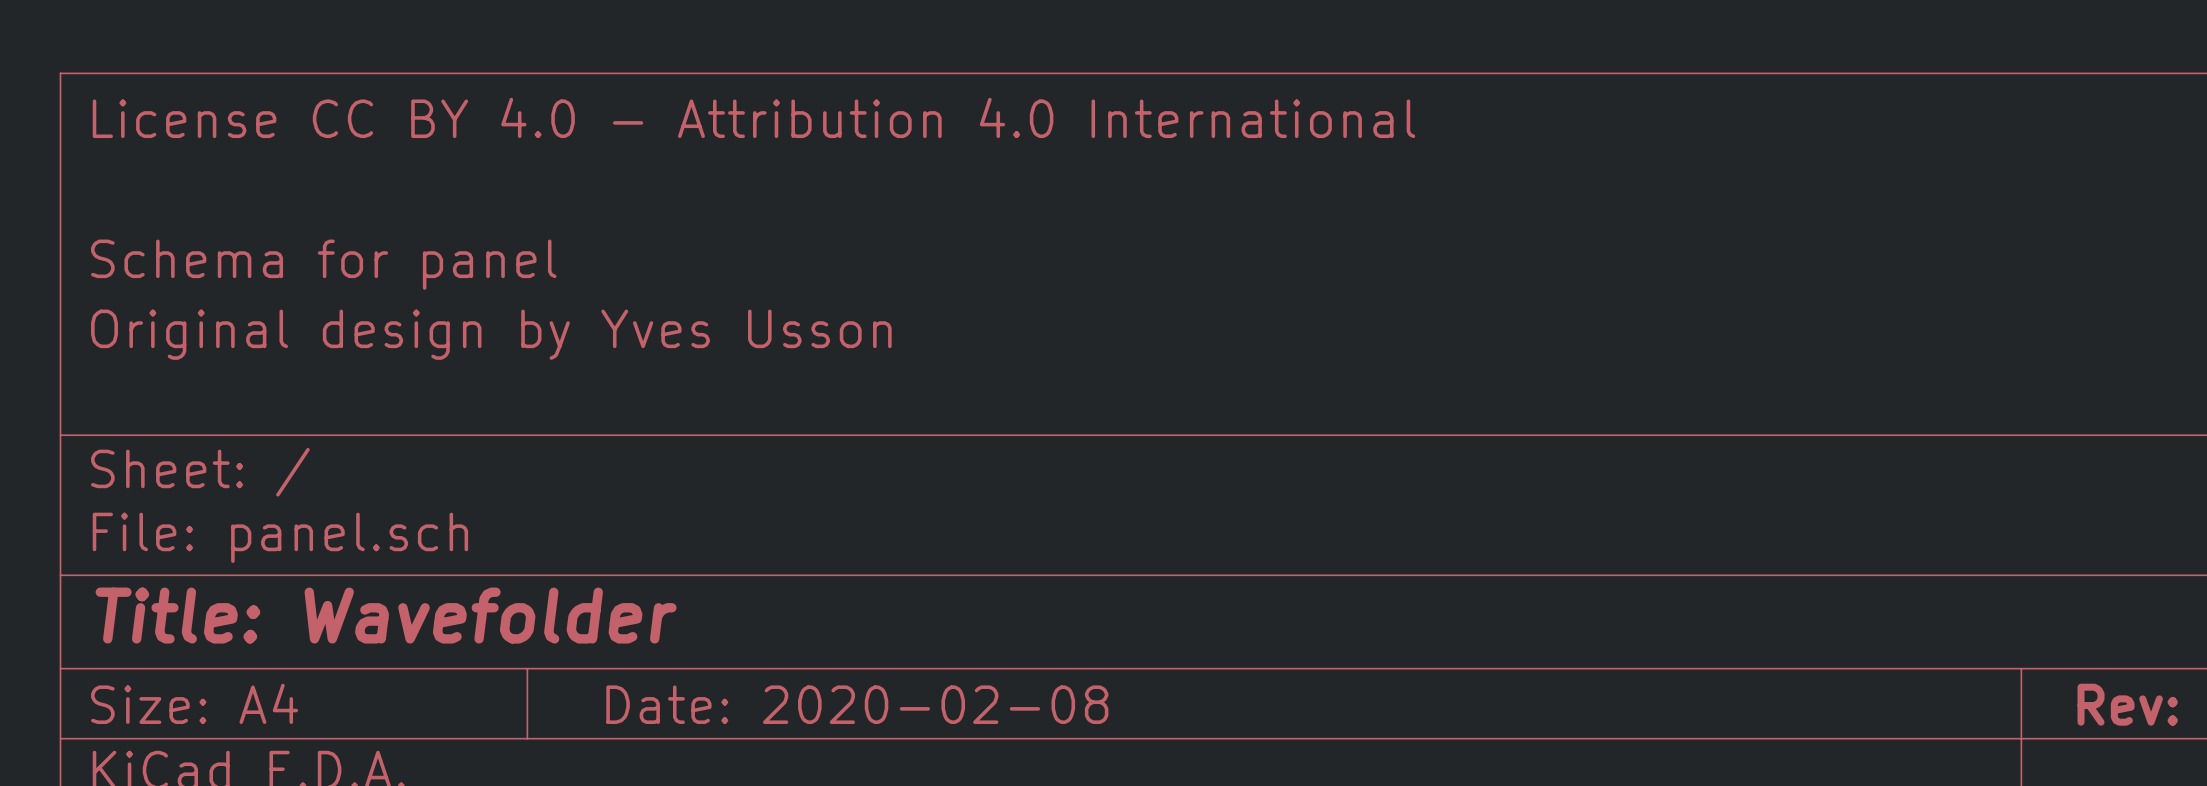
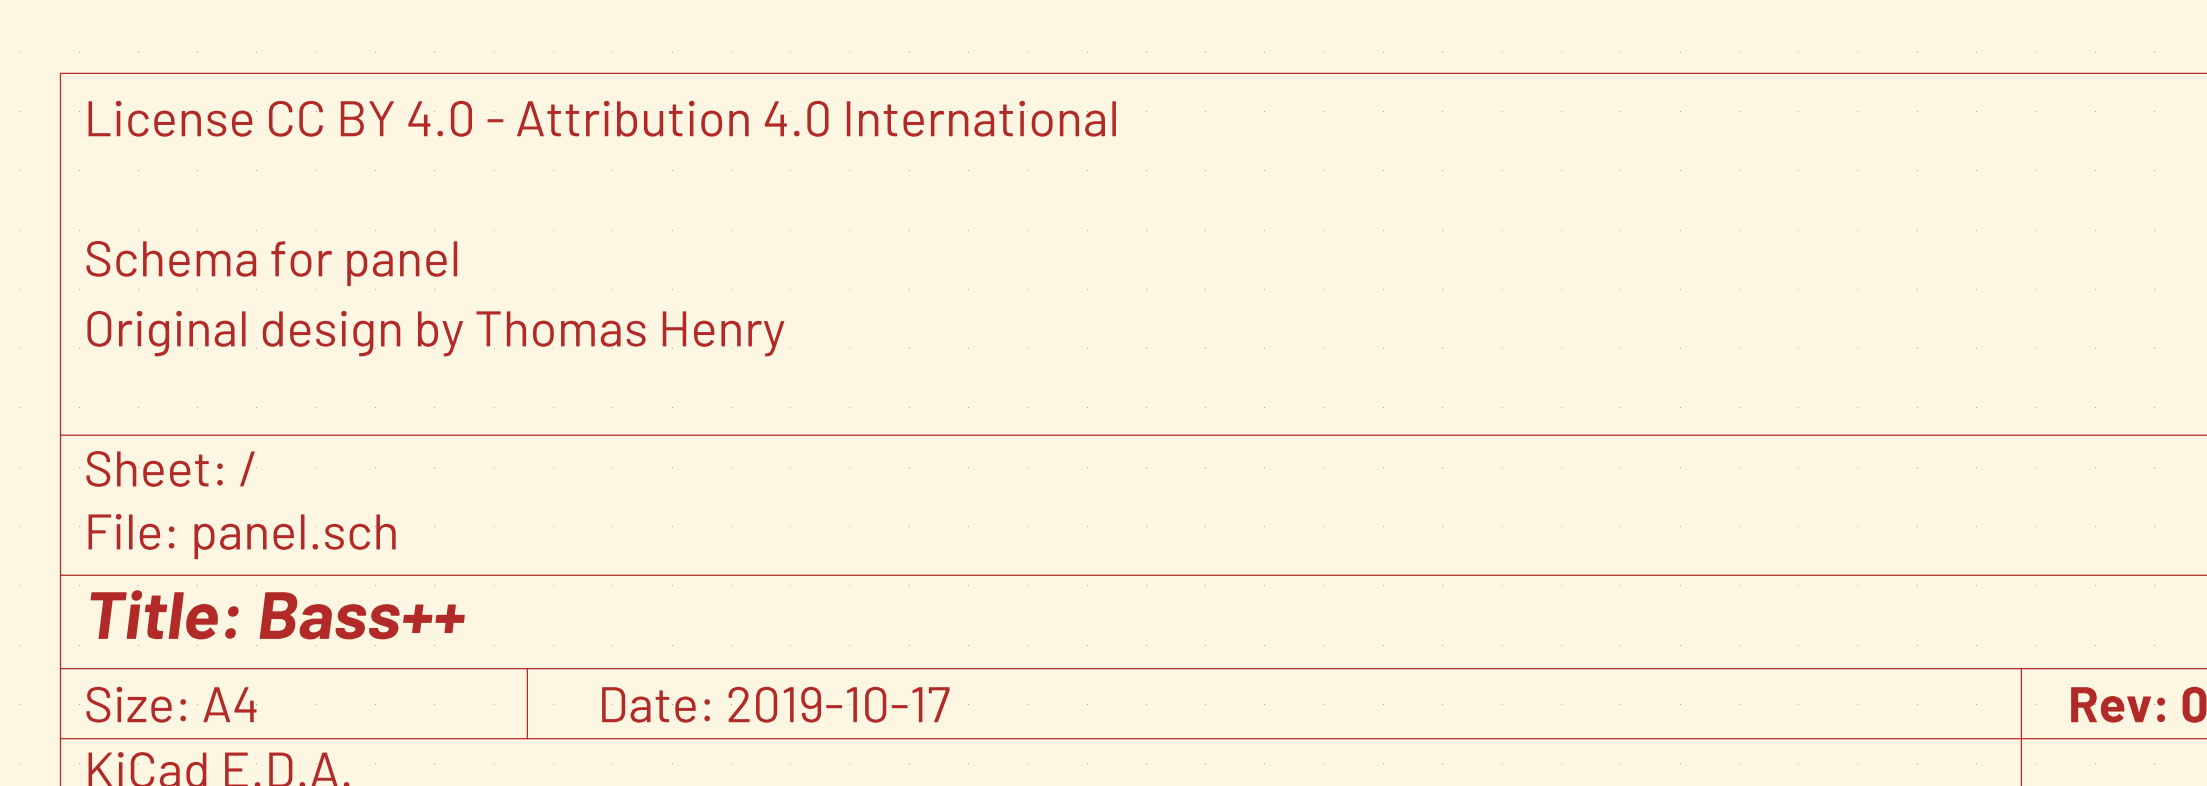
title block: Original design by Yves Usson (491, 334) -> Original design by Thomas Henry (435, 333)
title block: Title: Wavefolder (386, 615) -> Title: Bass++ (277, 614)
title block: Date: 2020-02-08 (857, 704) -> Date: 2019-10-17 (775, 704)

